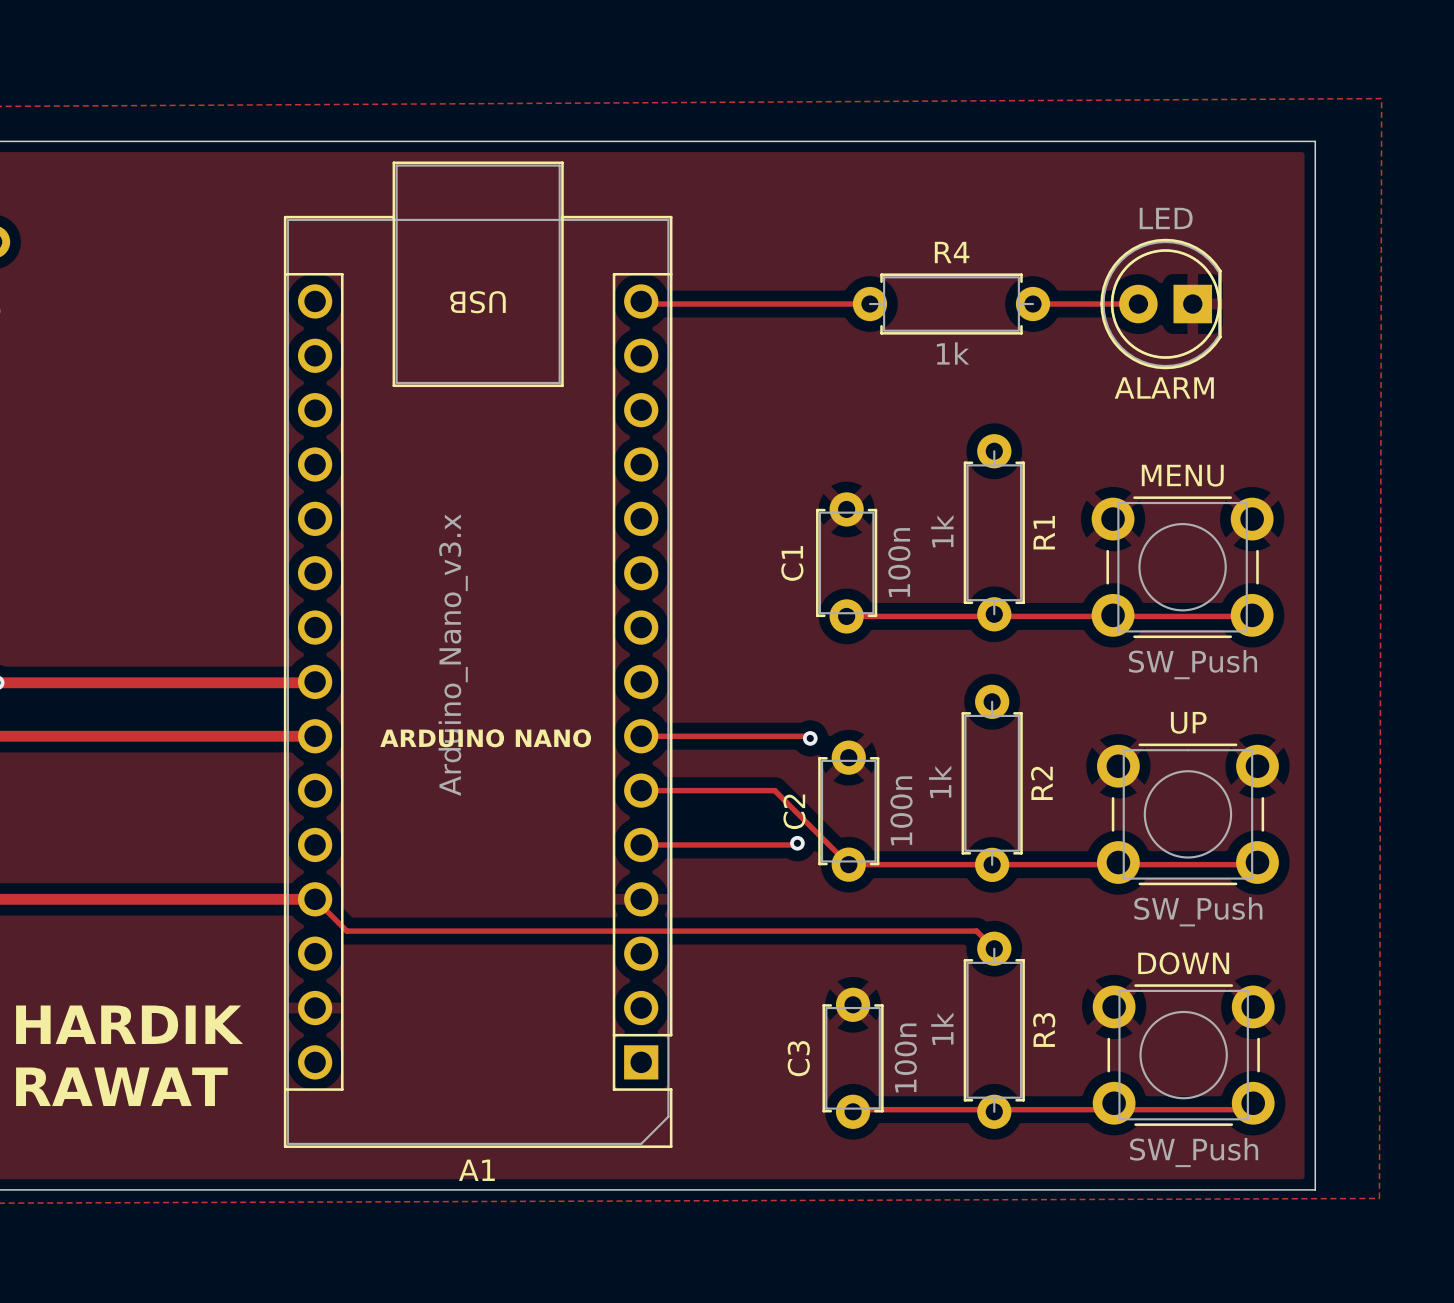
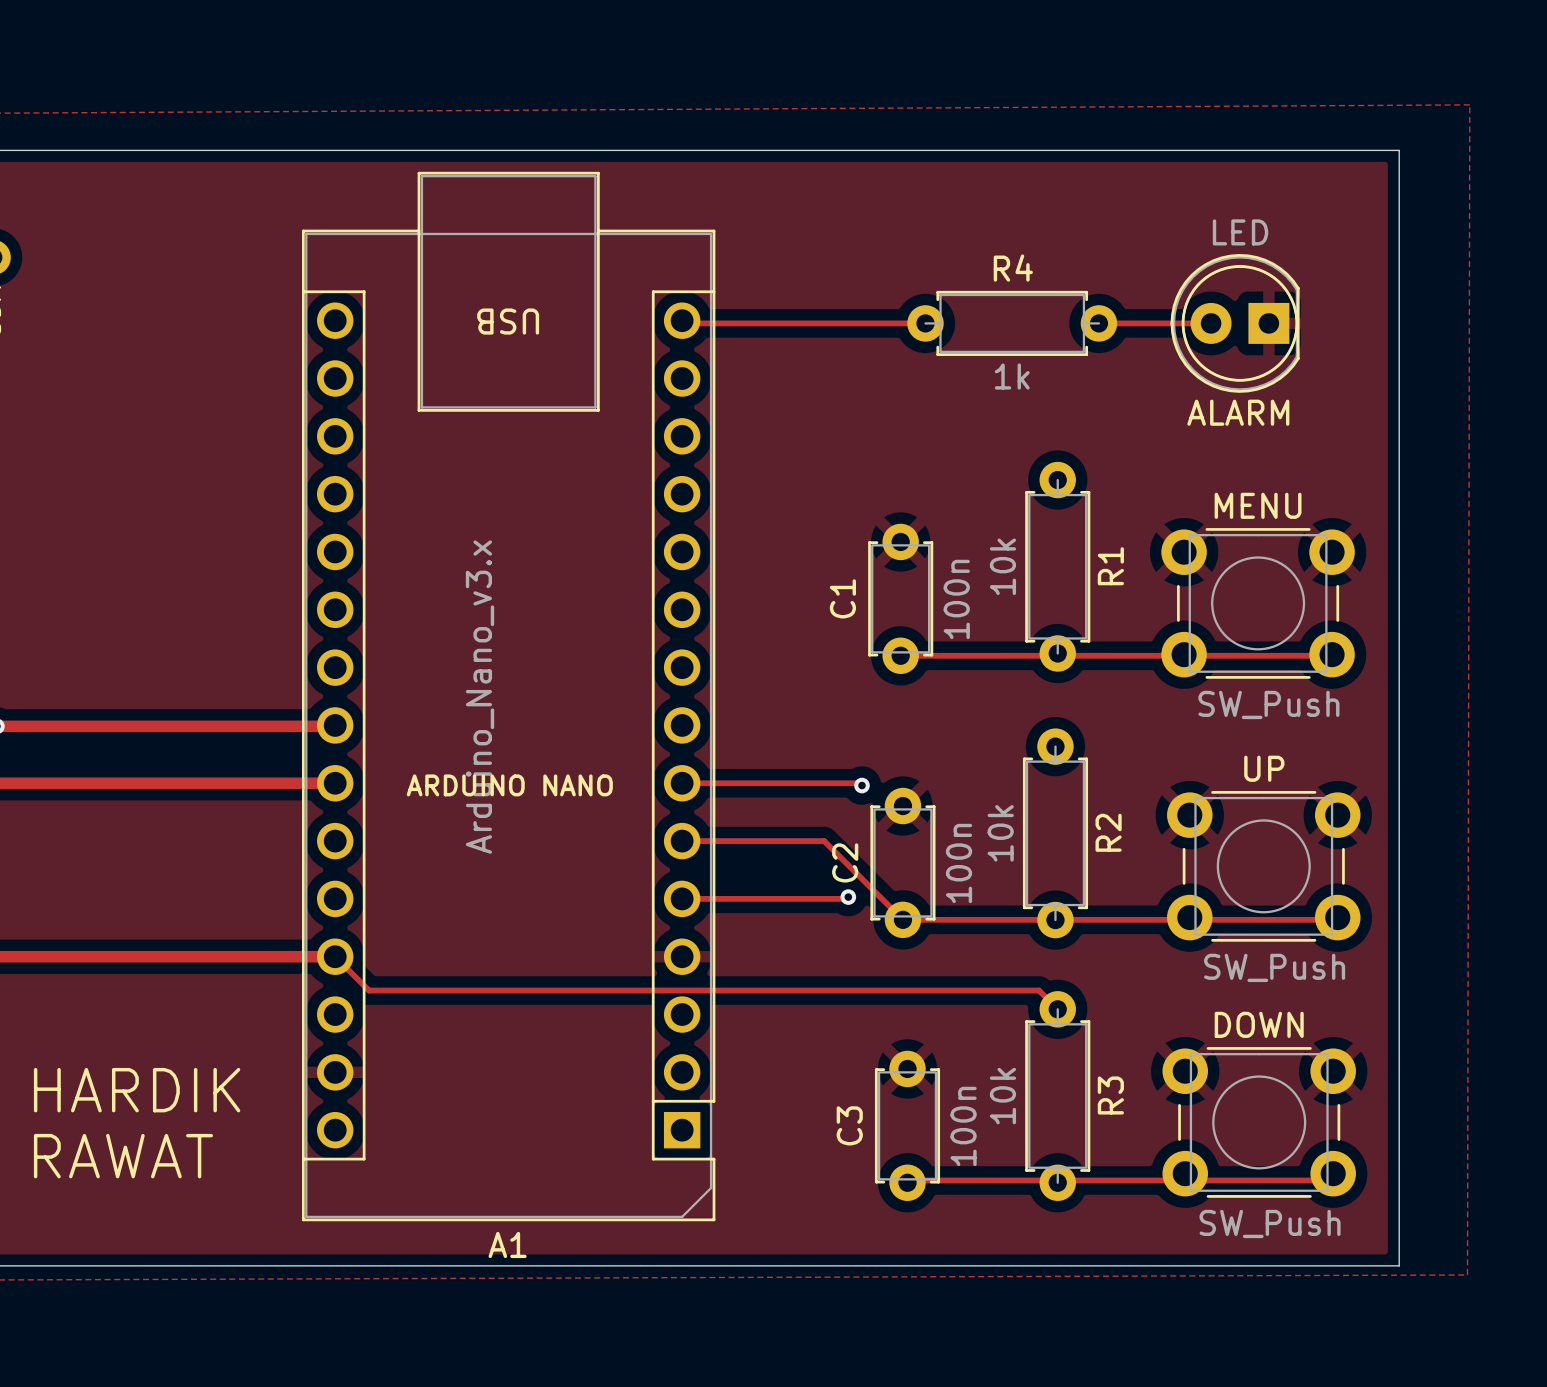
R1 value: 1k (942, 531) -> 10k (1002, 566)
R2 value: 1k (940, 781) -> 10k (1000, 833)
R3 value: 1k (942, 1028) -> 10k (1002, 1096)

